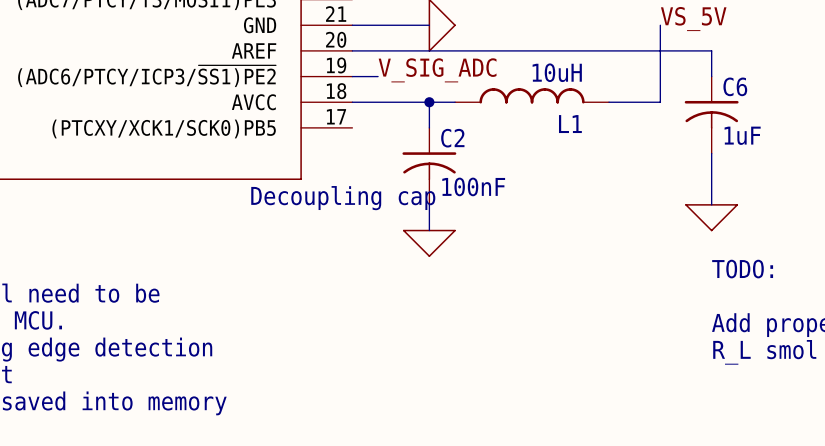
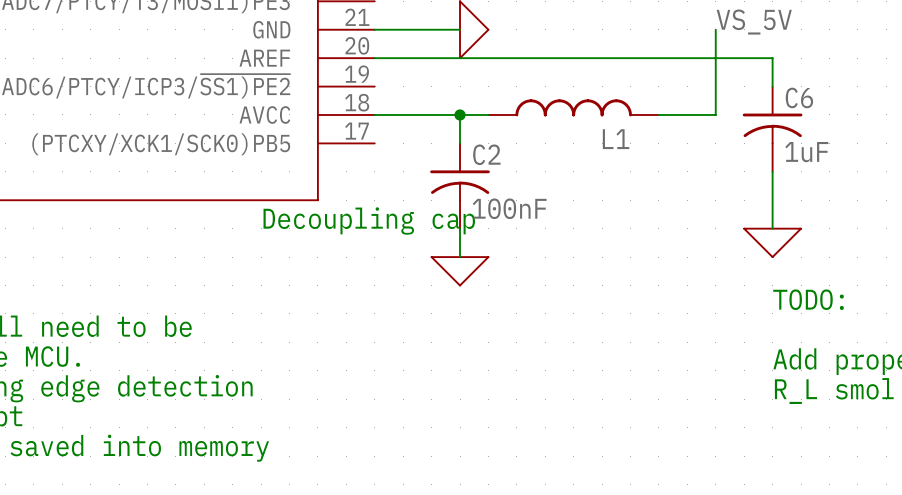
label: V_SIG_ADC (437, 70) -> none
L1 value: 10uH (557, 72) -> none
wire: (352, 76) (378, 76) -> none

